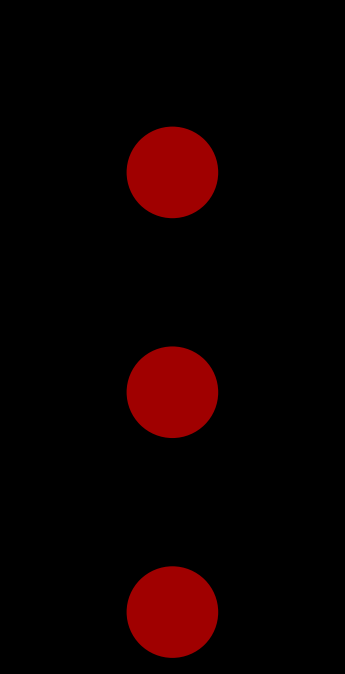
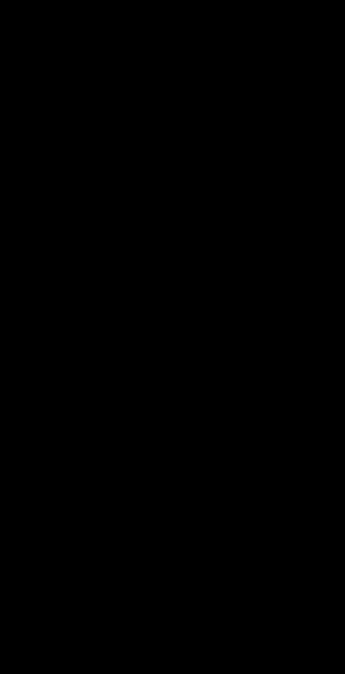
part: (172, 172) -> none
part: (172, 392) -> none
part: (172, 612) -> none

